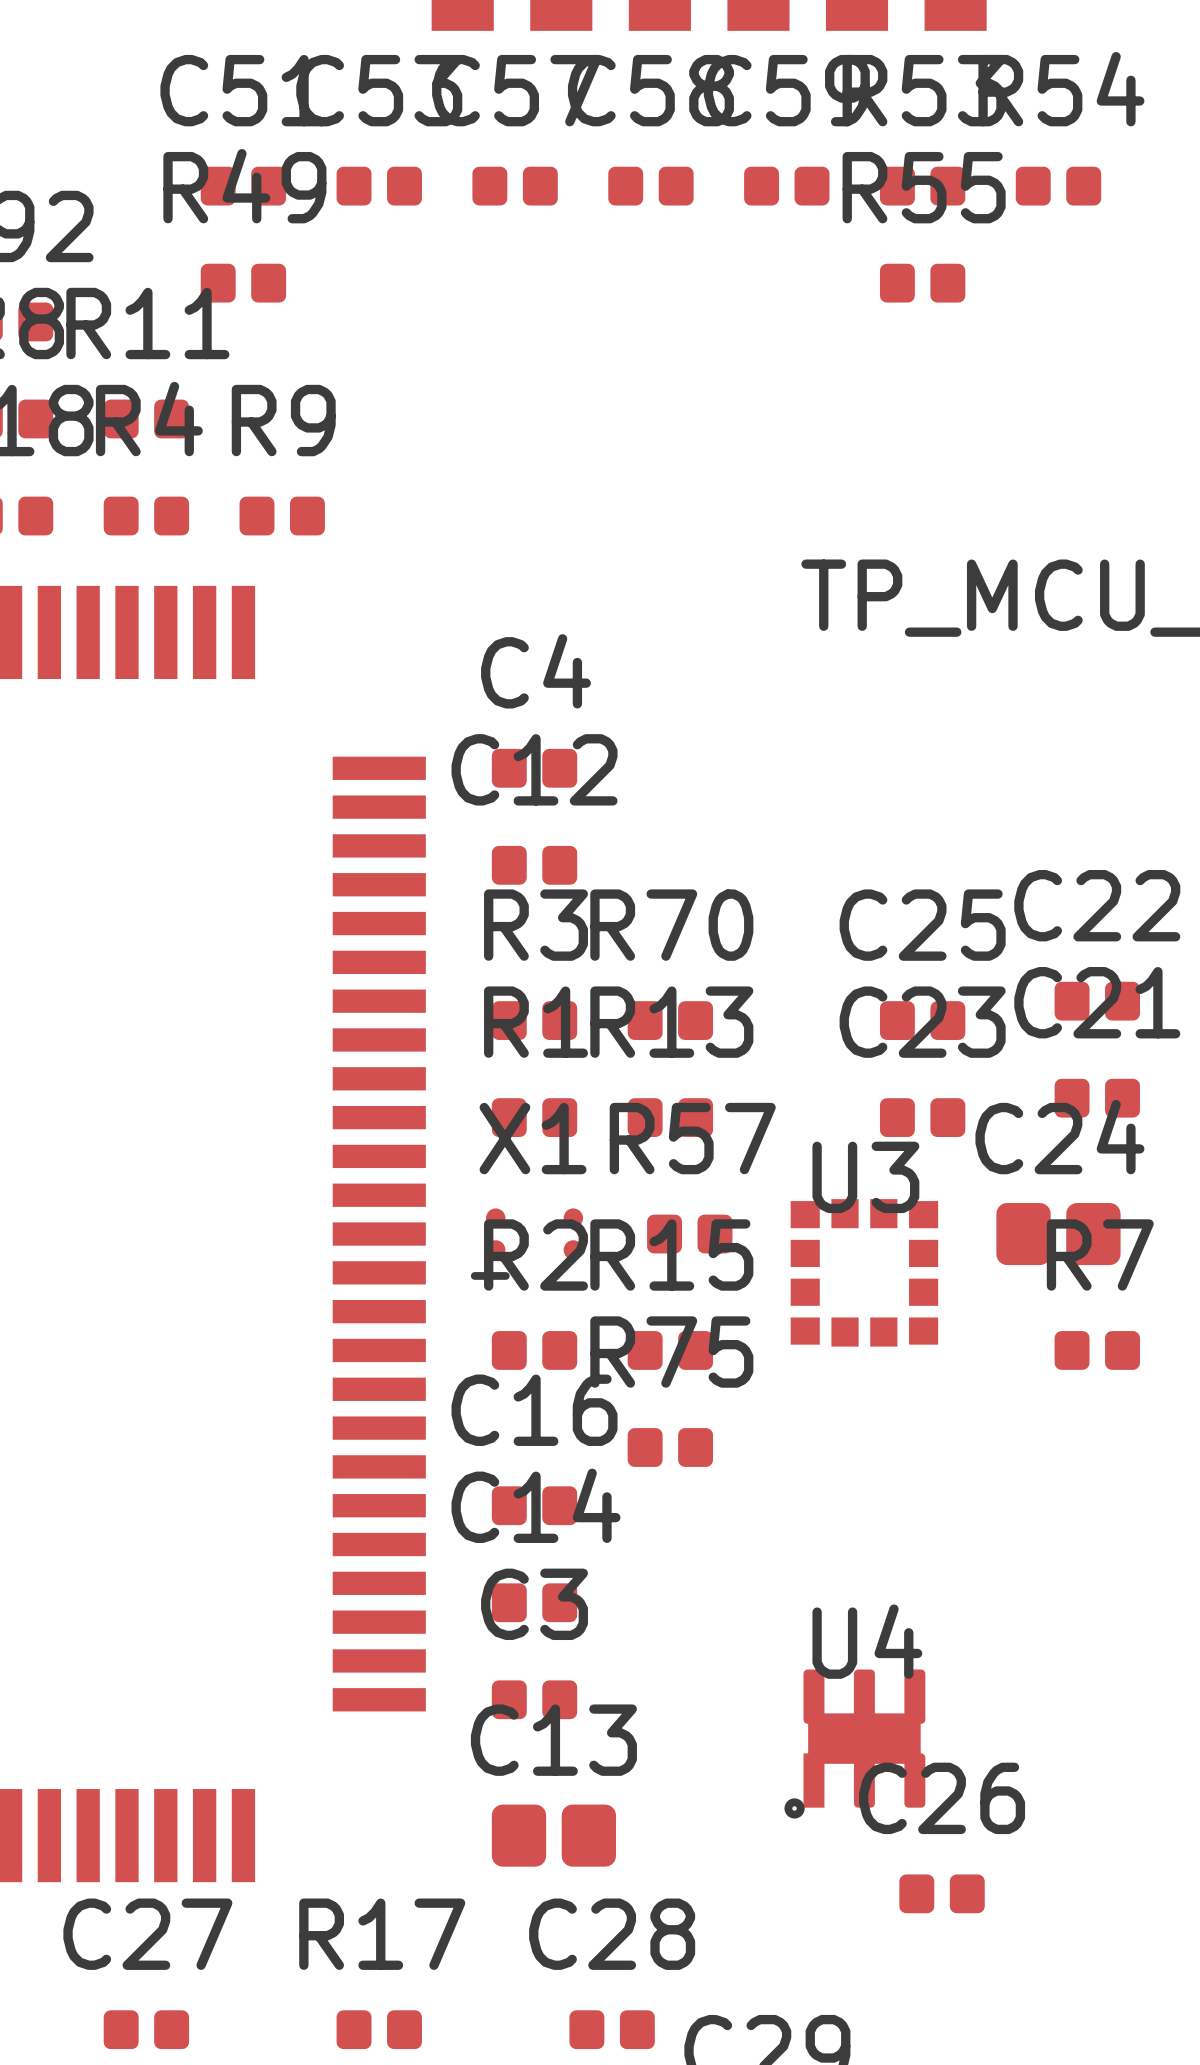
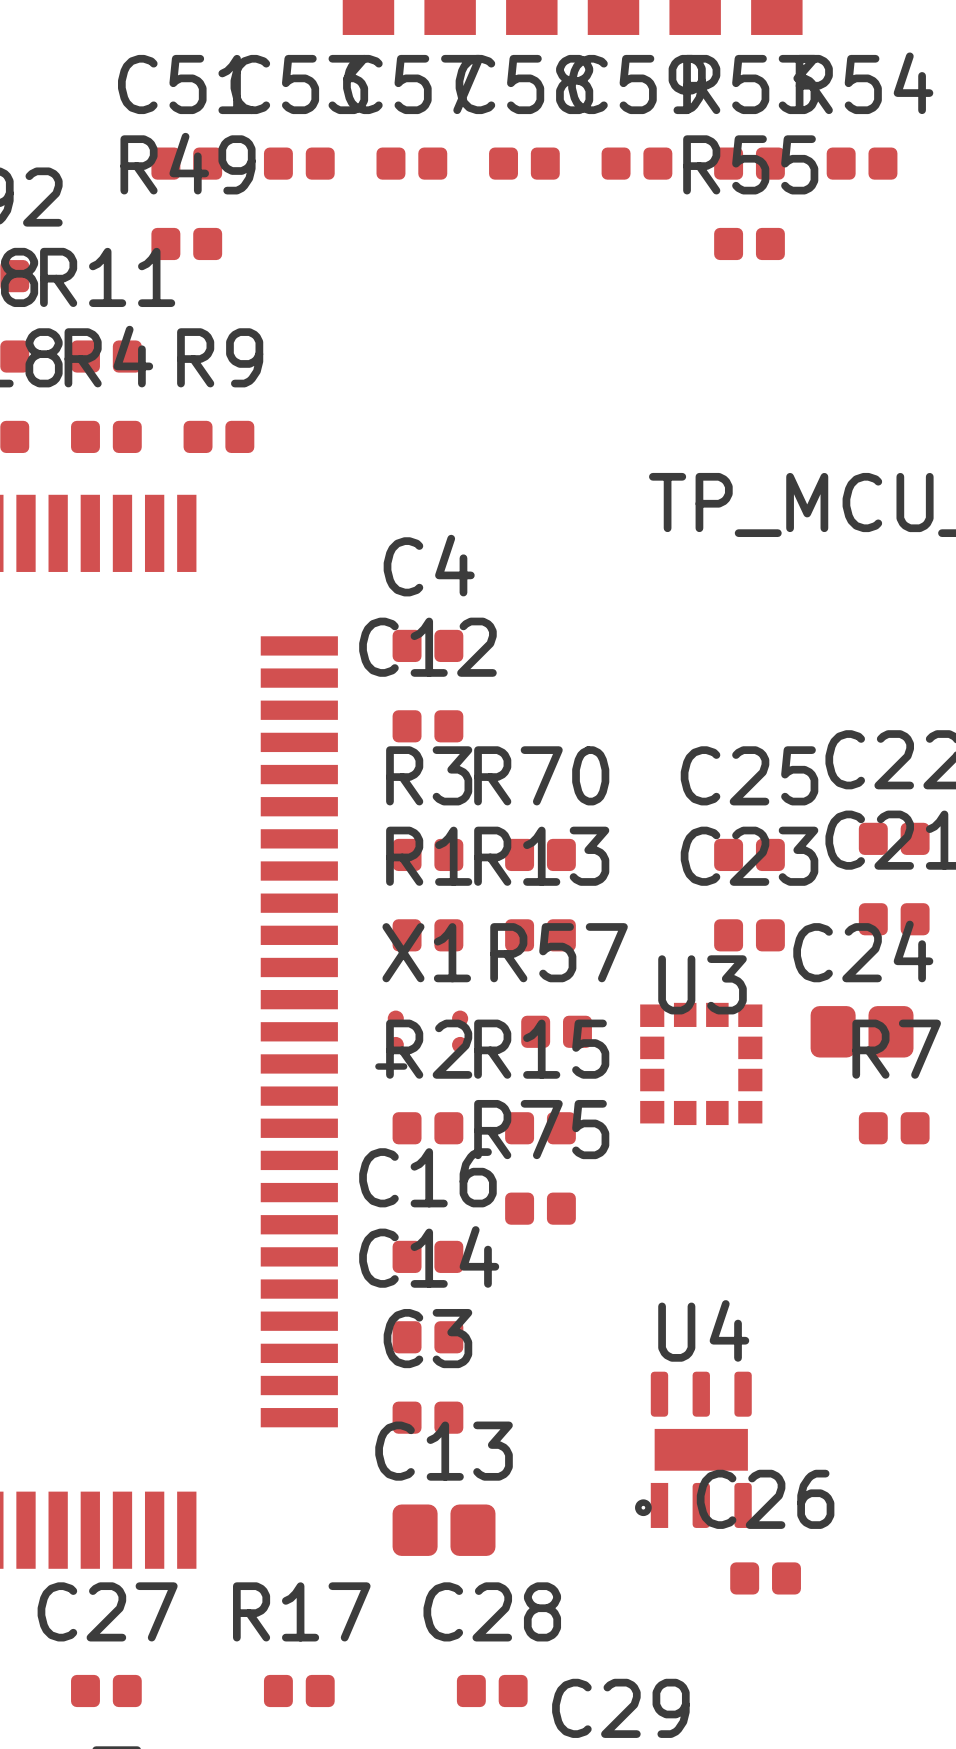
U4 name position: U4 (867, 1641) -> U4 (703, 1330)
U4 footprint: [784, 1669, 926, 1819] -> [635, 1371, 752, 1528]

